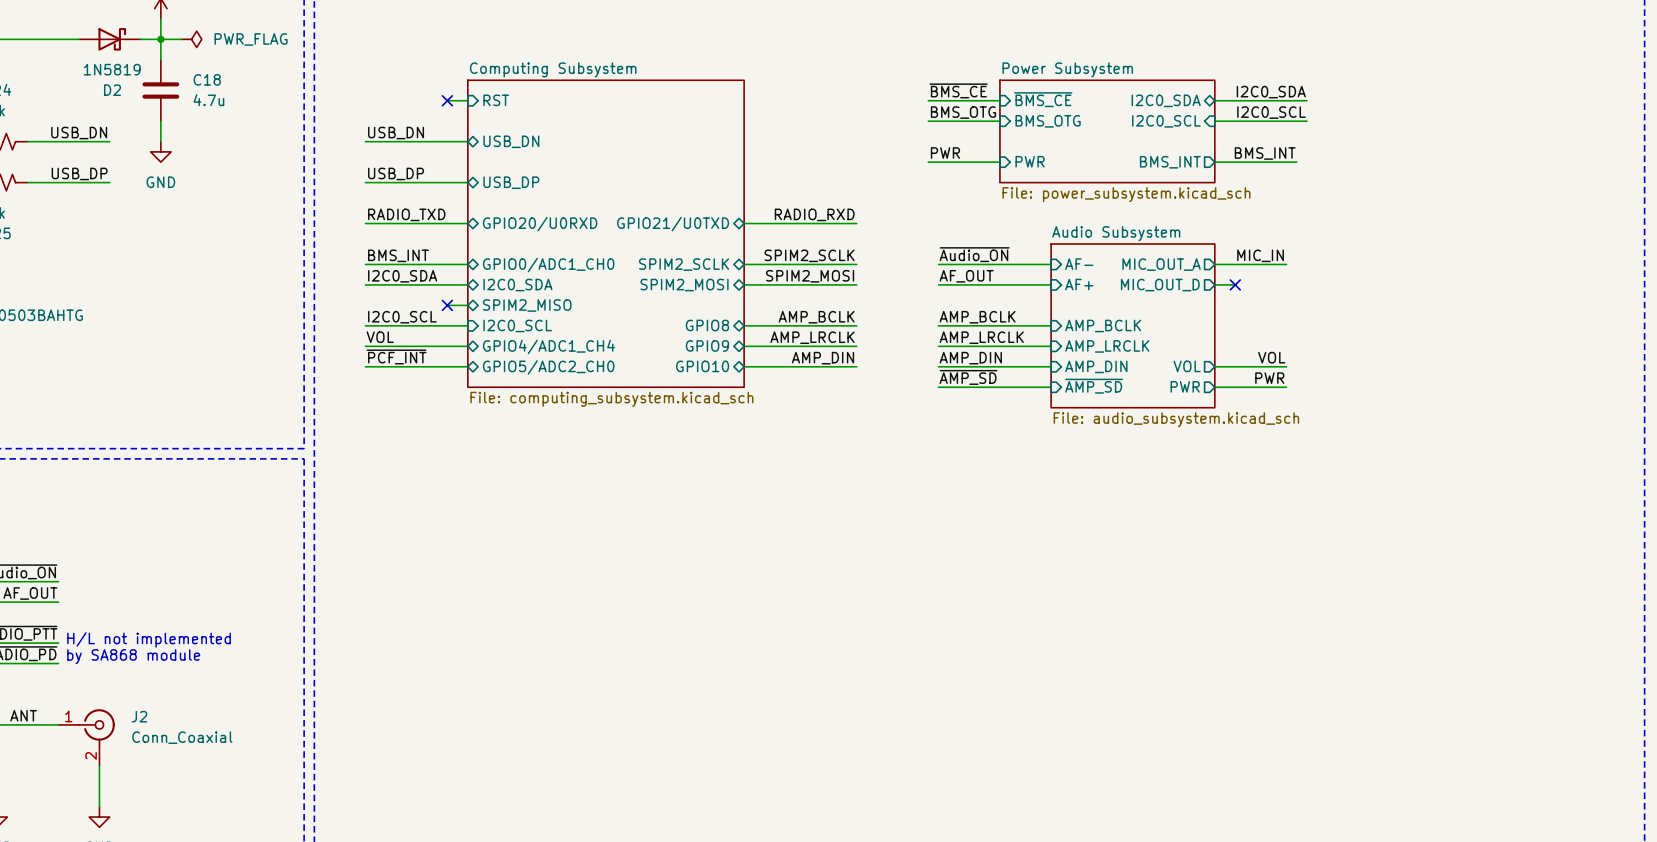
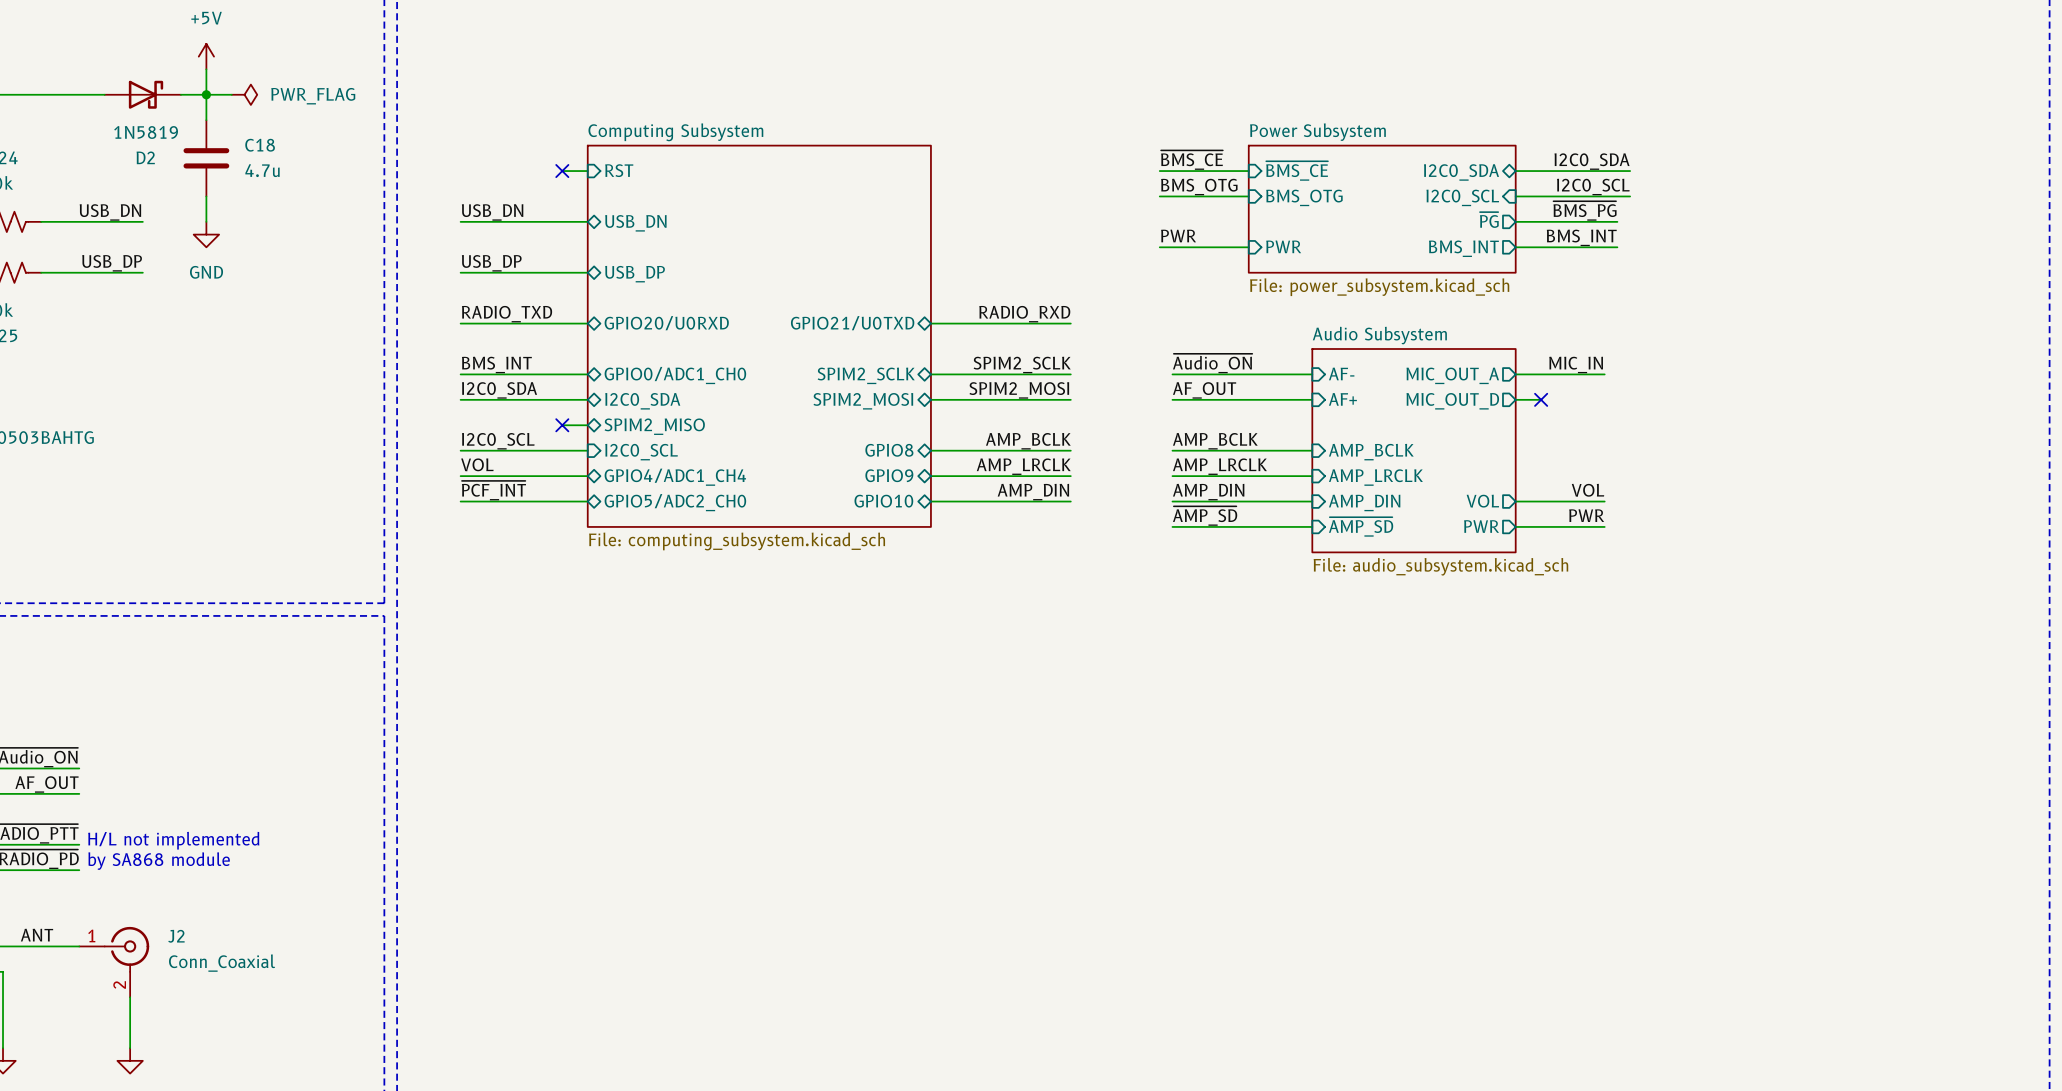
label: none -> ~{BMS_PG} (1585, 210)
sheet pin: none -> ~{PG} (1489, 220)
wire: none -> (1515, 221) (1617, 221)

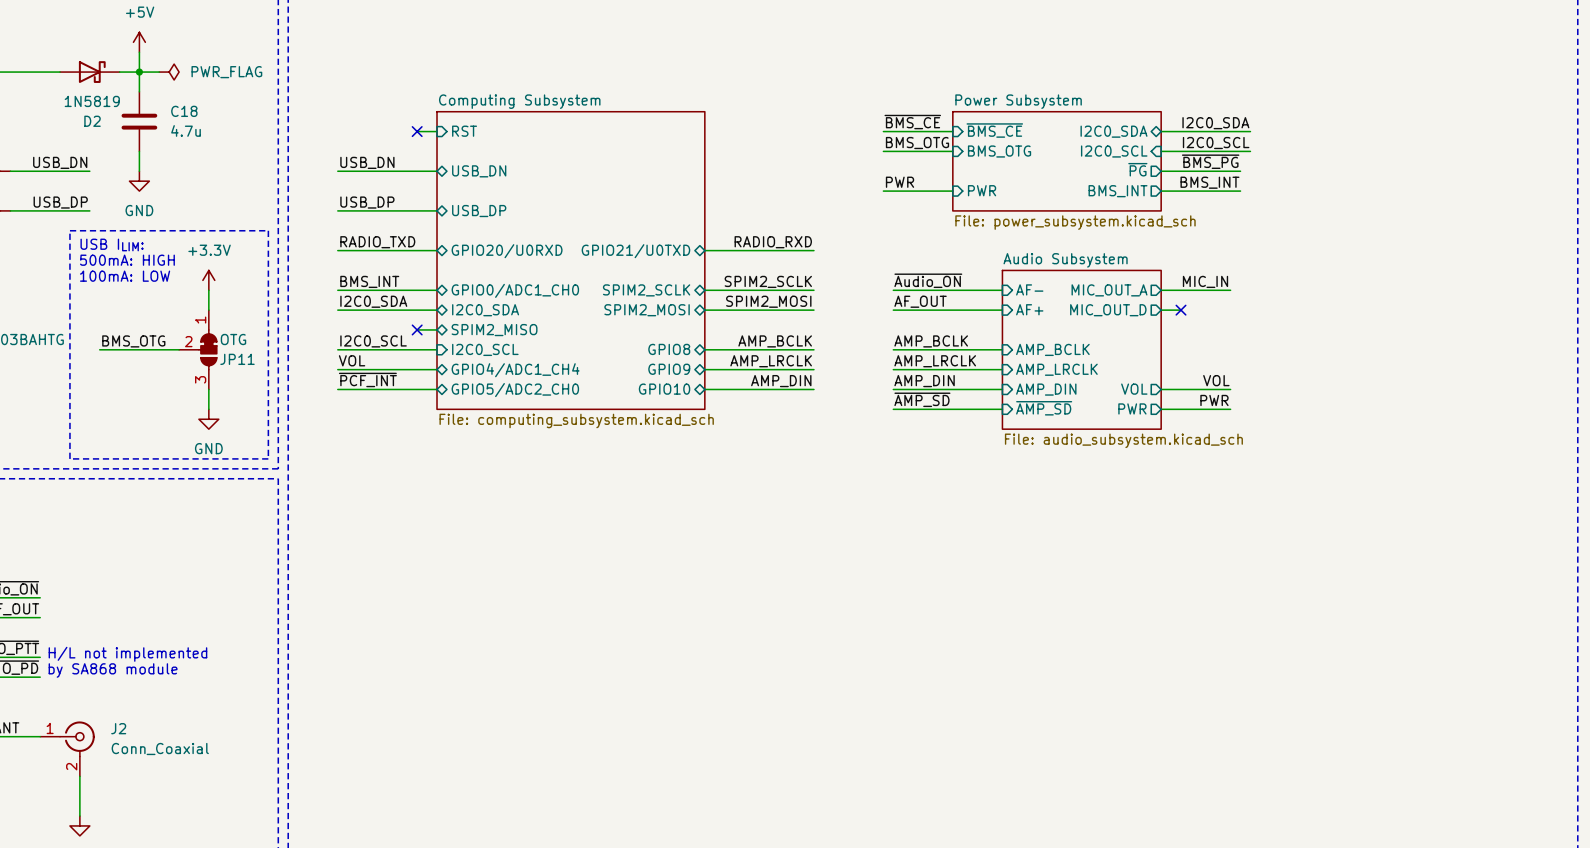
line: none -> (69, 230) (268, 230) (268, 458) (69, 458) (69, 230)
text: none -> USB ILIM: (112, 244)
text: none -> 500mA: HIGH (127, 260)
text: none -> 100mA: LOW (125, 276)
power symbol: none -> +3.3V (208, 280)
wire: none -> (208, 290) (208, 310)
label: none -> BMS_OTG (133, 341)
wire: none -> (99, 349) (179, 349)
JP11: none -> OTG (197, 349)
wire: none -> (208, 389) (208, 409)
power symbol: none -> GND (208, 419)

